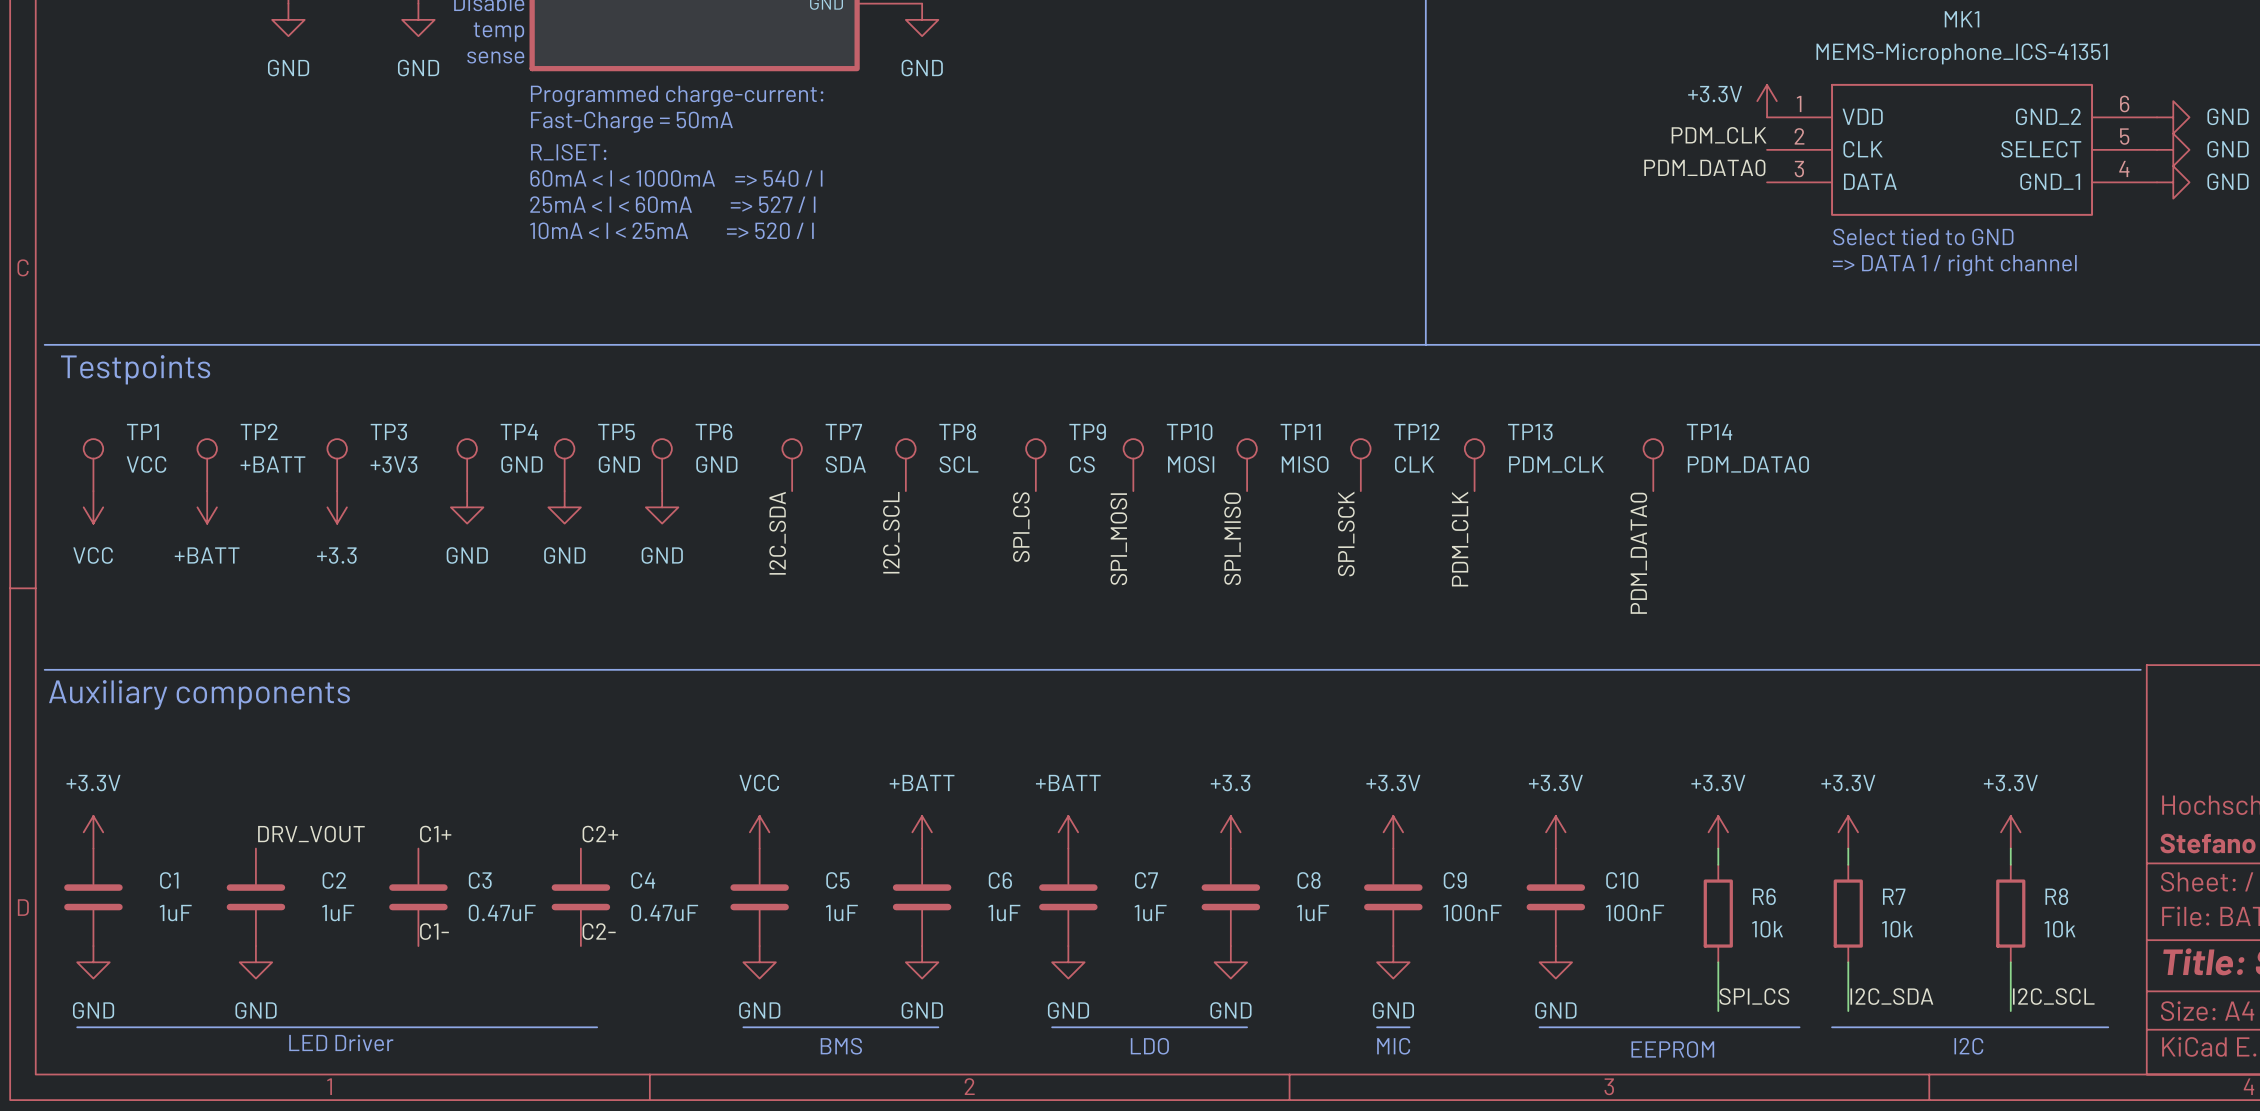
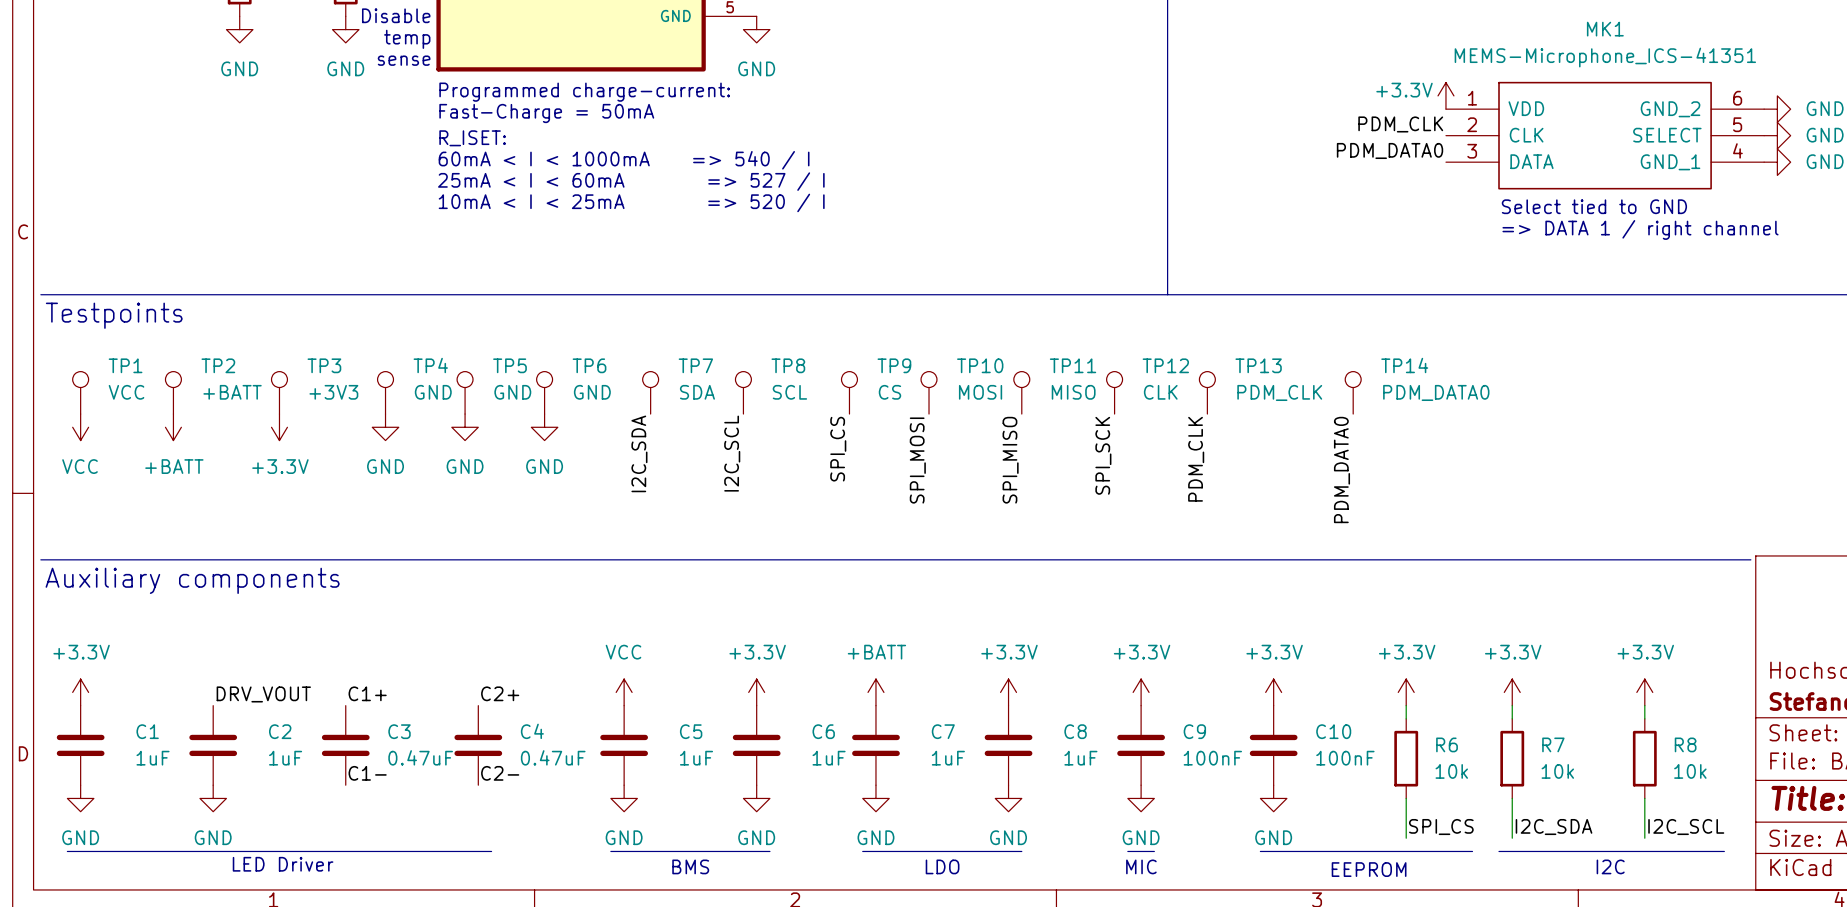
power symbol: +3.3 (337, 507) -> +3.3V (279, 427)
power symbol: +BATT (922, 832) -> +3.3V (756, 692)
power symbol: +3.3 (1230, 832) -> +3.3V (1008, 692)

